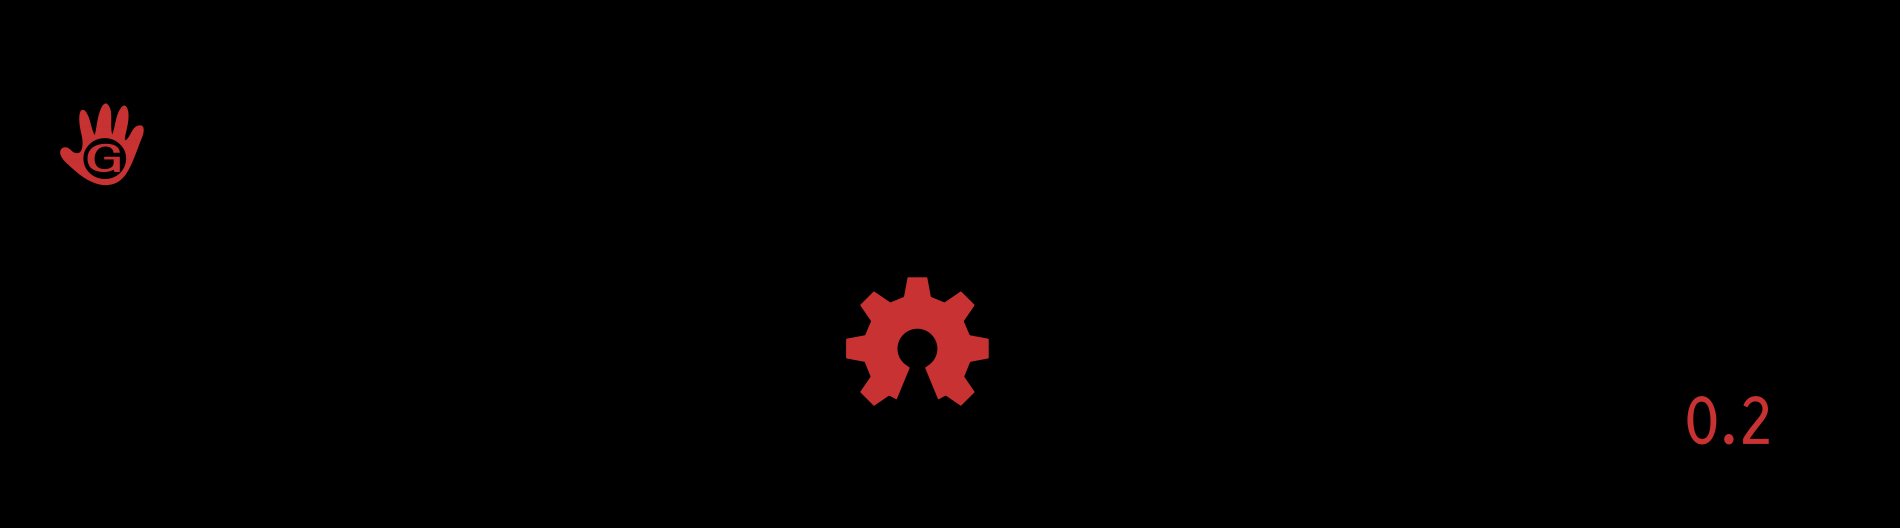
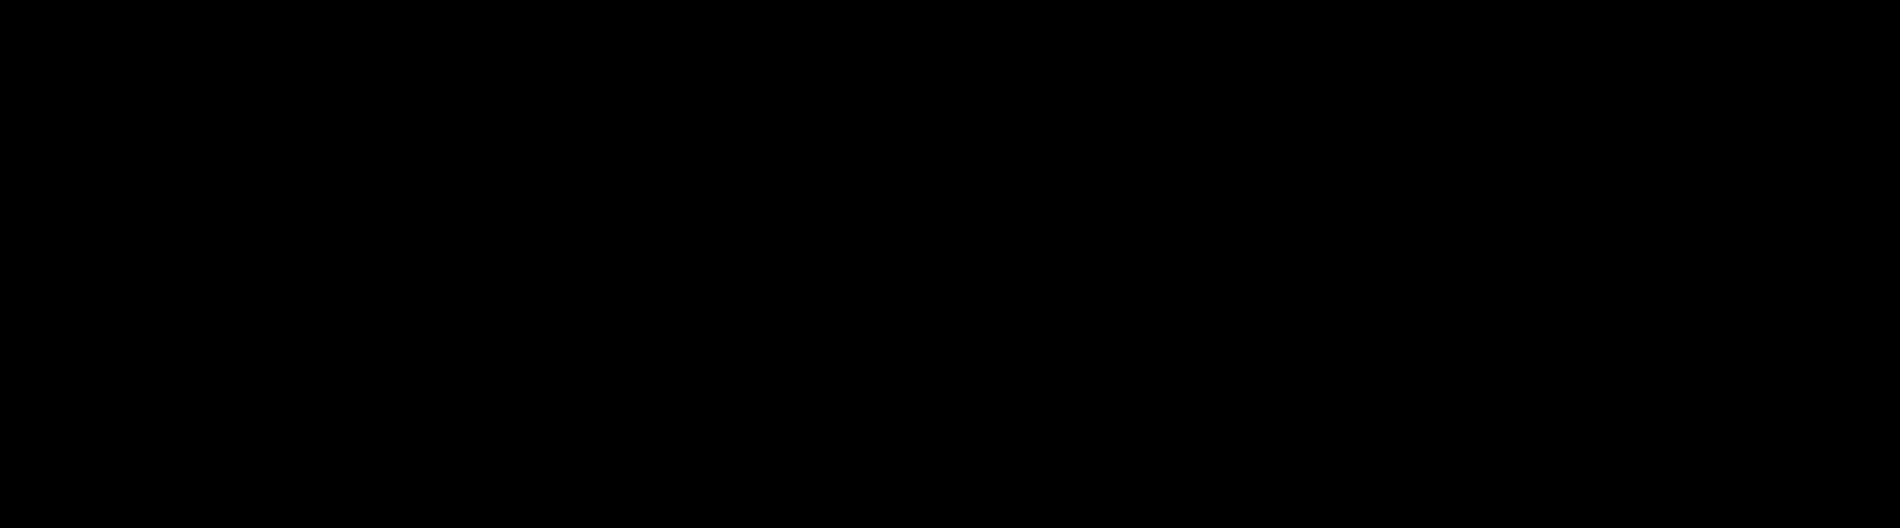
part: (101, 144) -> none
part: (917, 341) -> none
text: 0.2 (1728, 420) -> none

